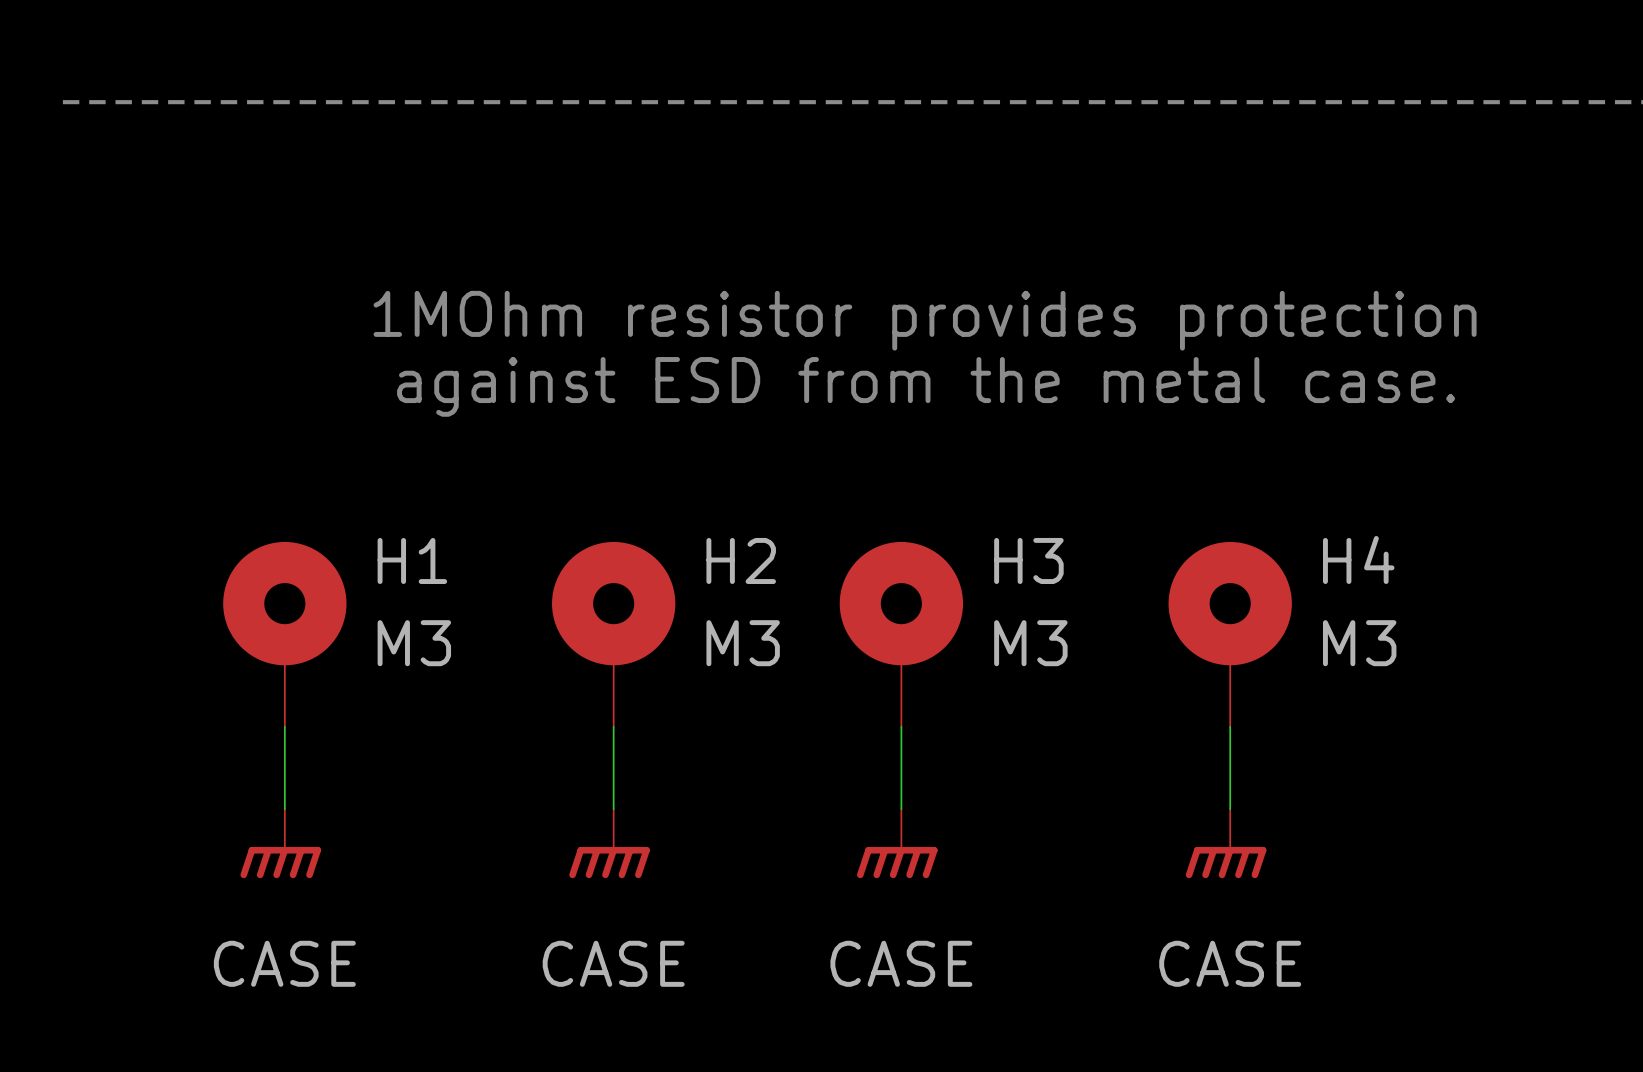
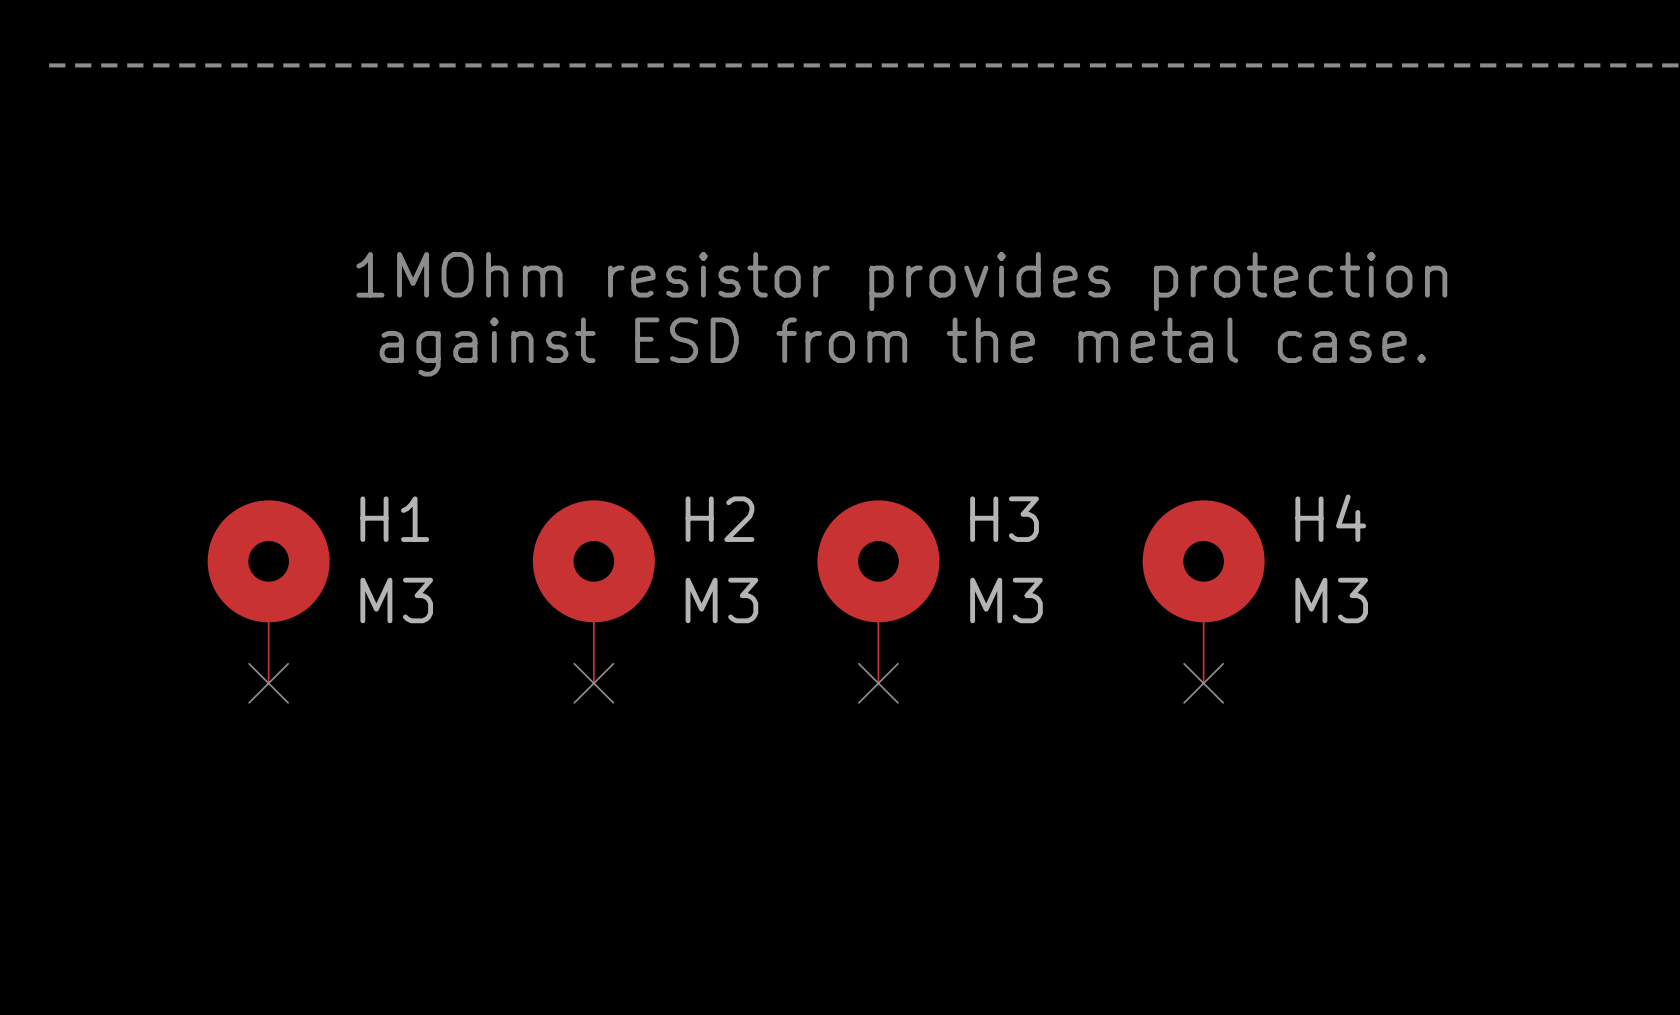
wire: (284, 726) (284, 809) -> none
no-connect mark: none -> (268, 683)
wire: (613, 726) (613, 809) -> none
no-connect mark: none -> (593, 683)
wire: (901, 726) (901, 809) -> none
no-connect mark: none -> (878, 683)
wire: (1230, 726) (1230, 809) -> none
no-connect mark: none -> (1203, 683)
power symbol: CASE (280, 843) -> none
power symbol: CASE (609, 843) -> none
power symbol: CASE (897, 843) -> none
power symbol: CASE (1226, 843) -> none

